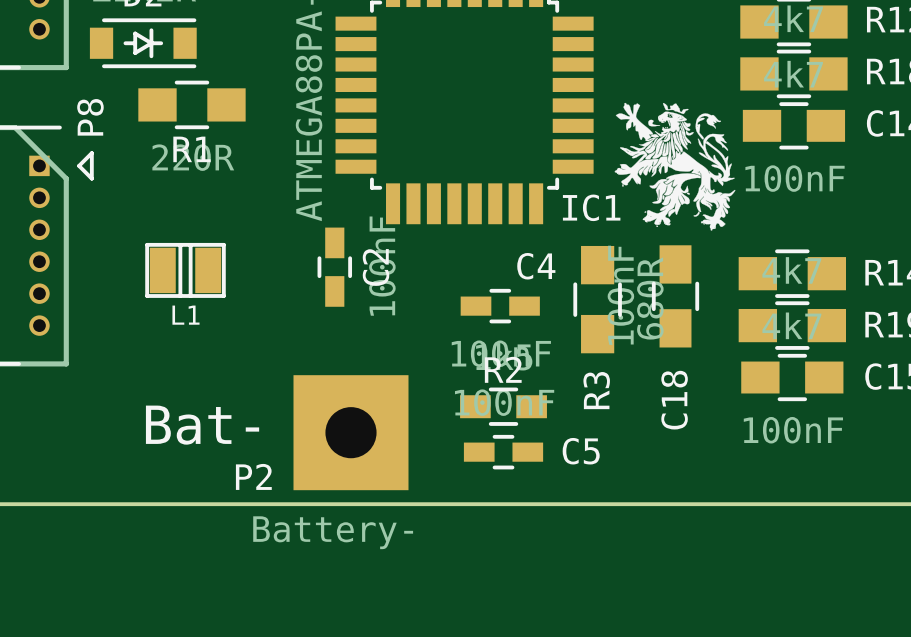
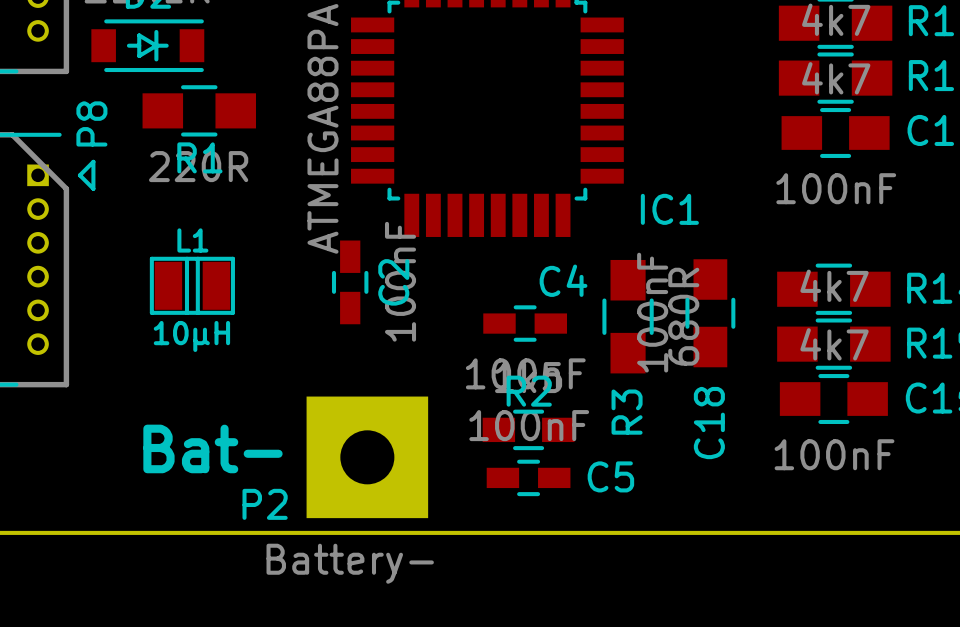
drawing: [614, 102, 736, 231] -> none
IC1 name position: IC1 (591, 207) -> IC1 (669, 209)
L1 name position: L1 (185, 315) -> L1 (192, 240)
L1 value: none -> 10µH (191, 336)

